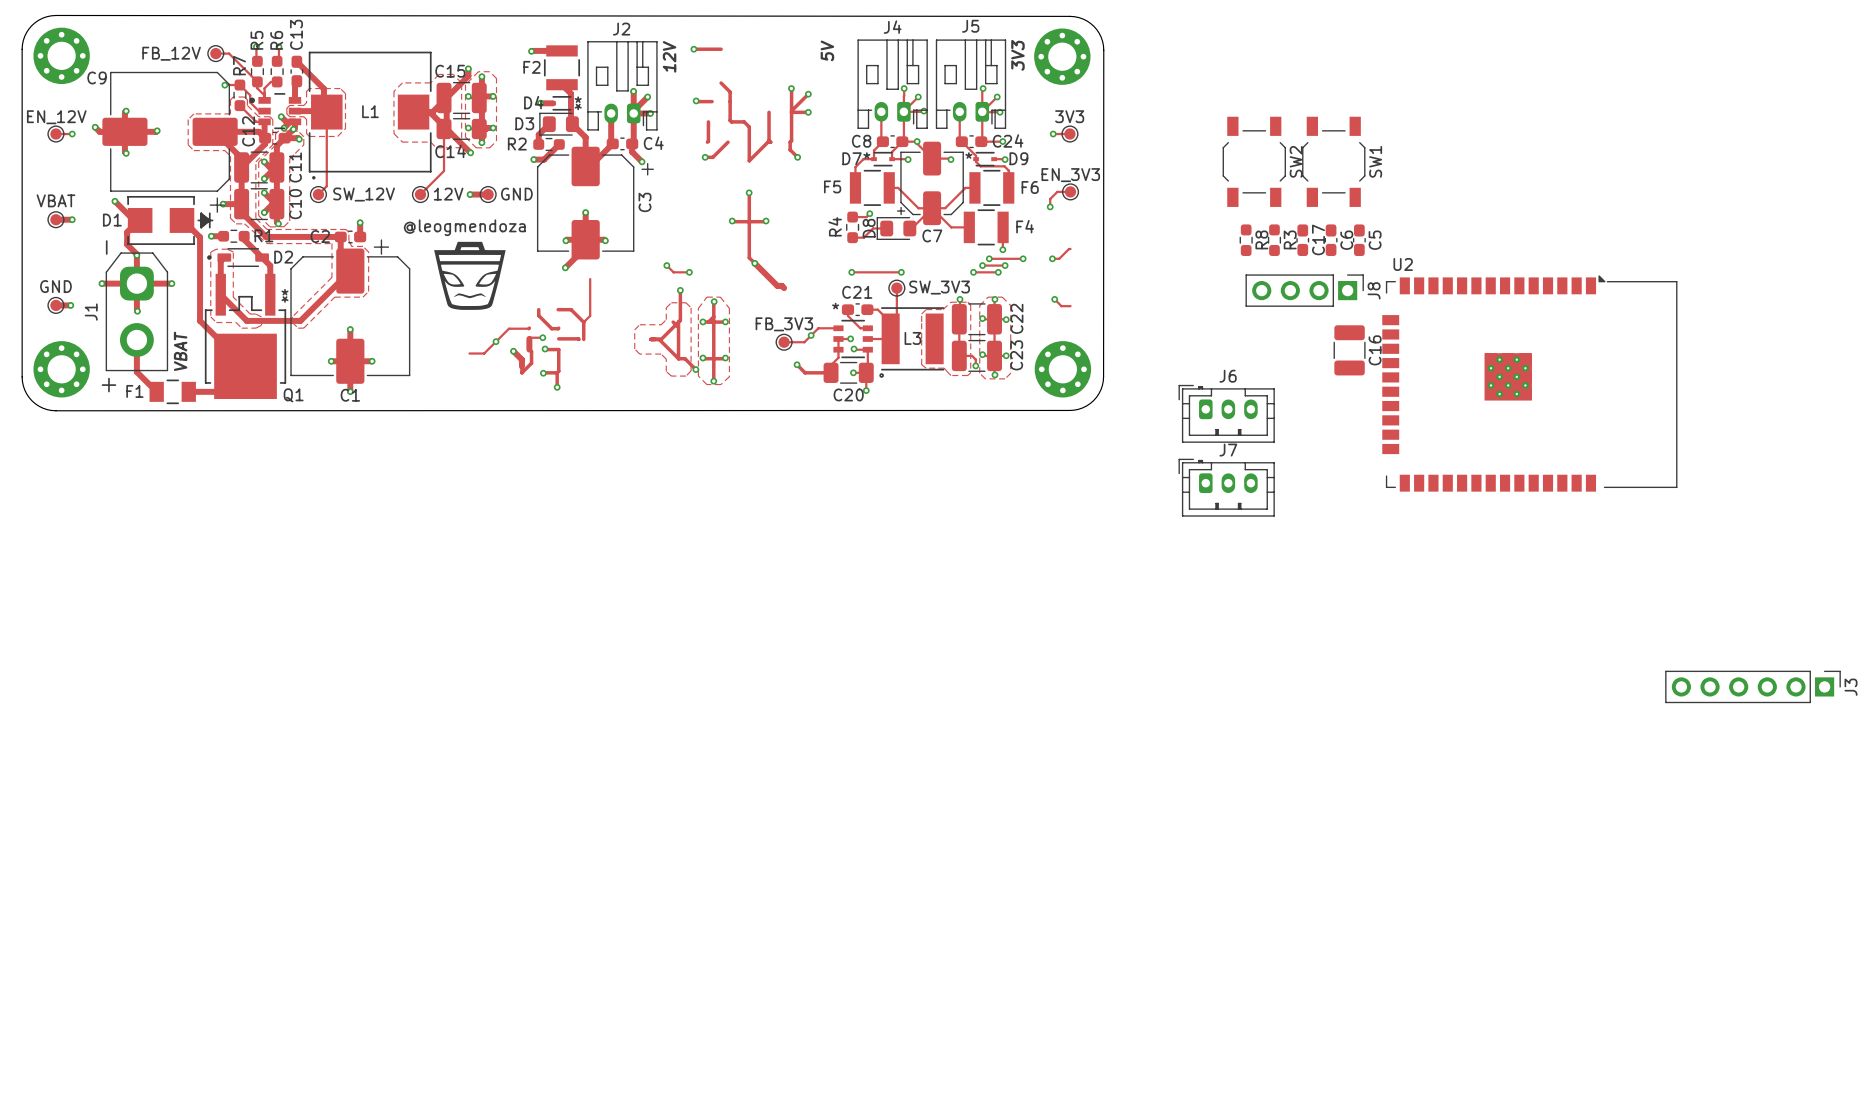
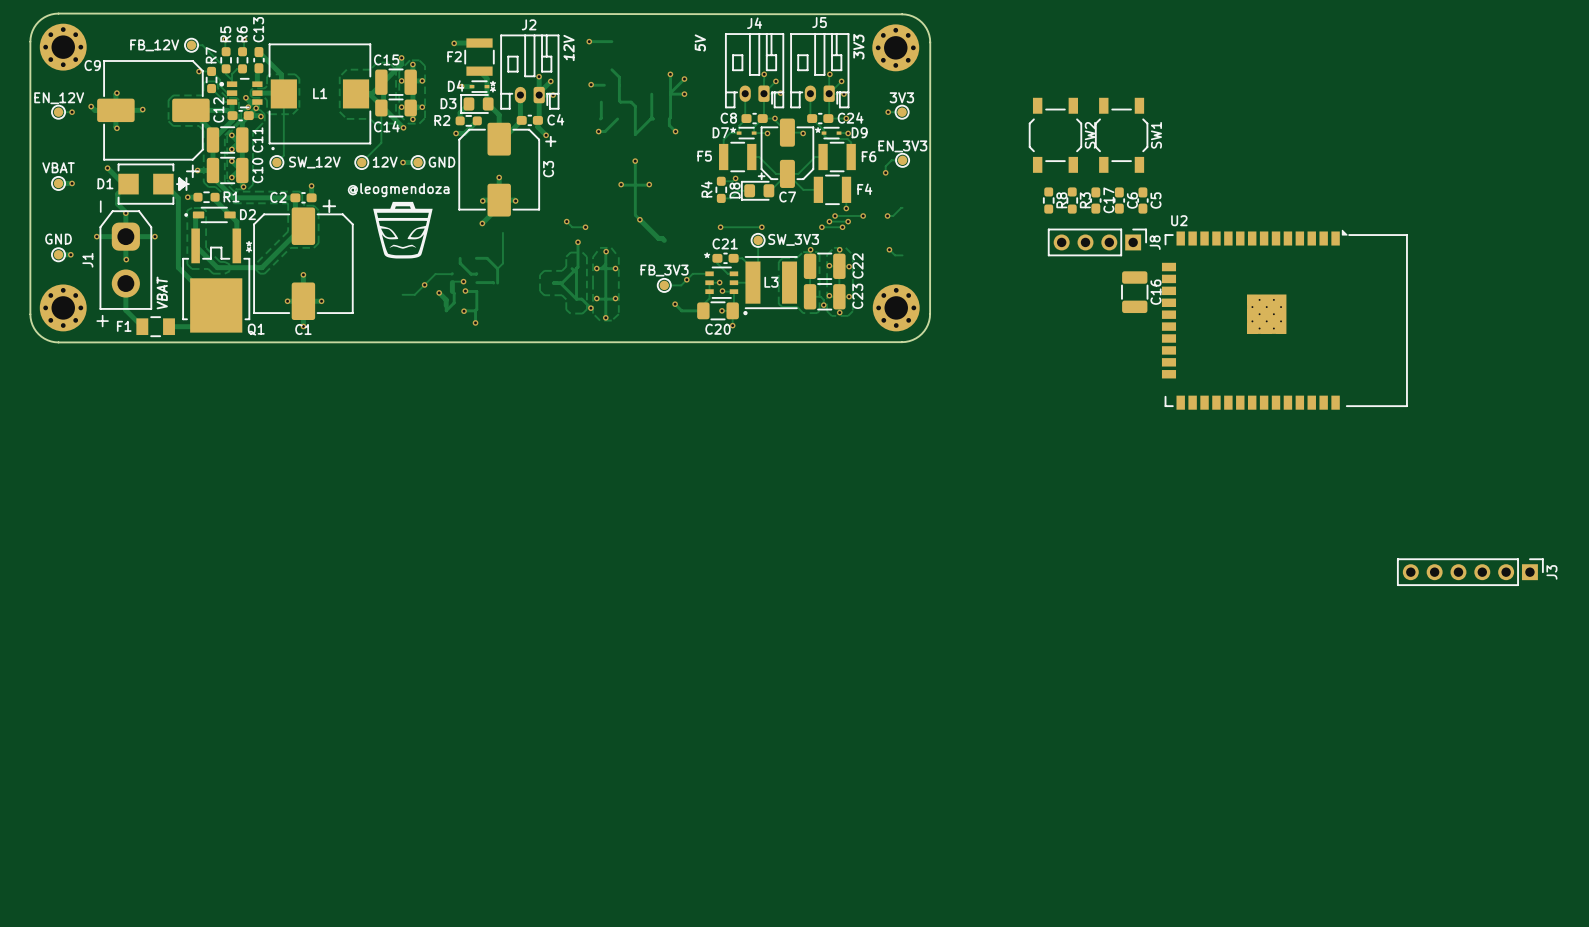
J6: (1226, 413) -> none
J7: (1226, 487) -> none

